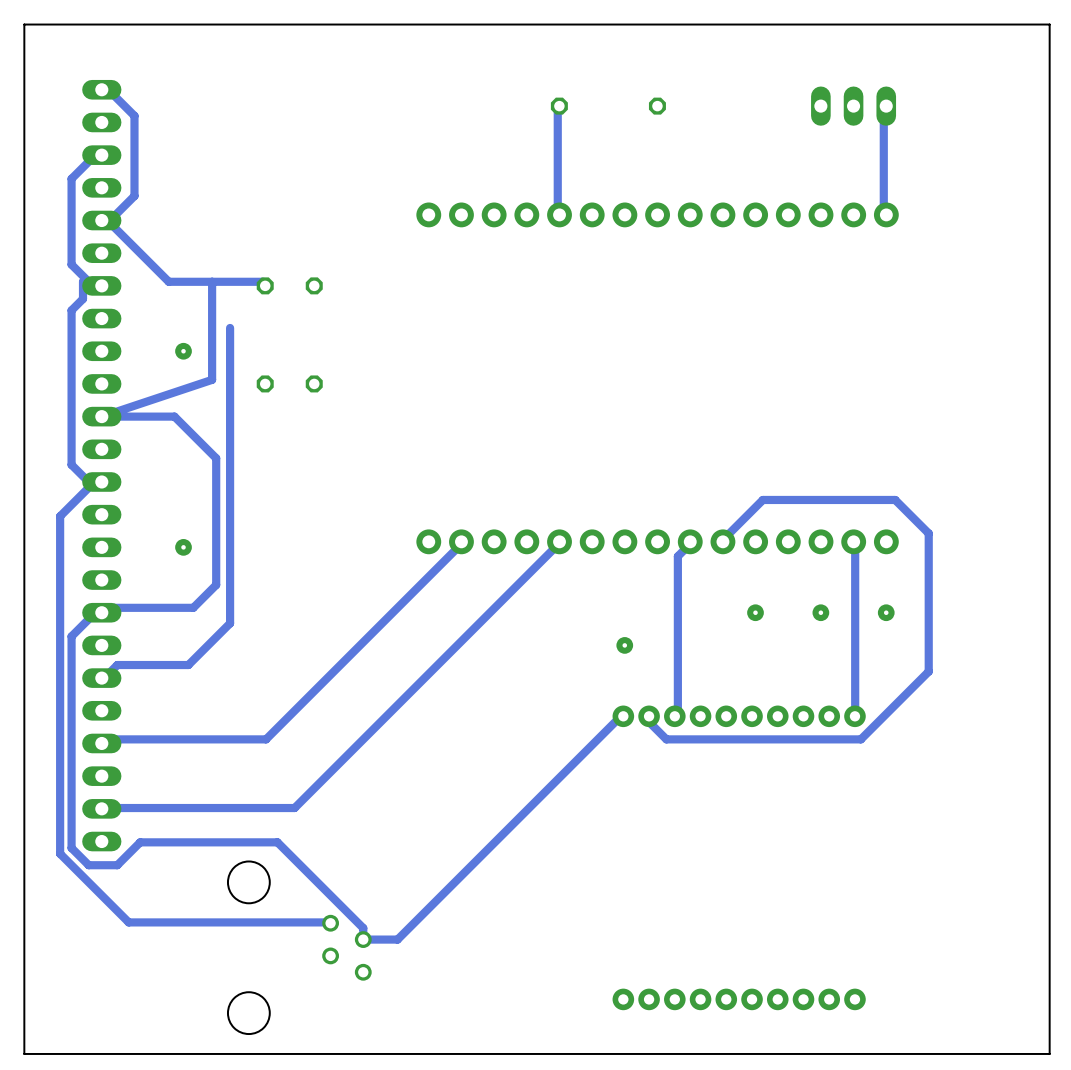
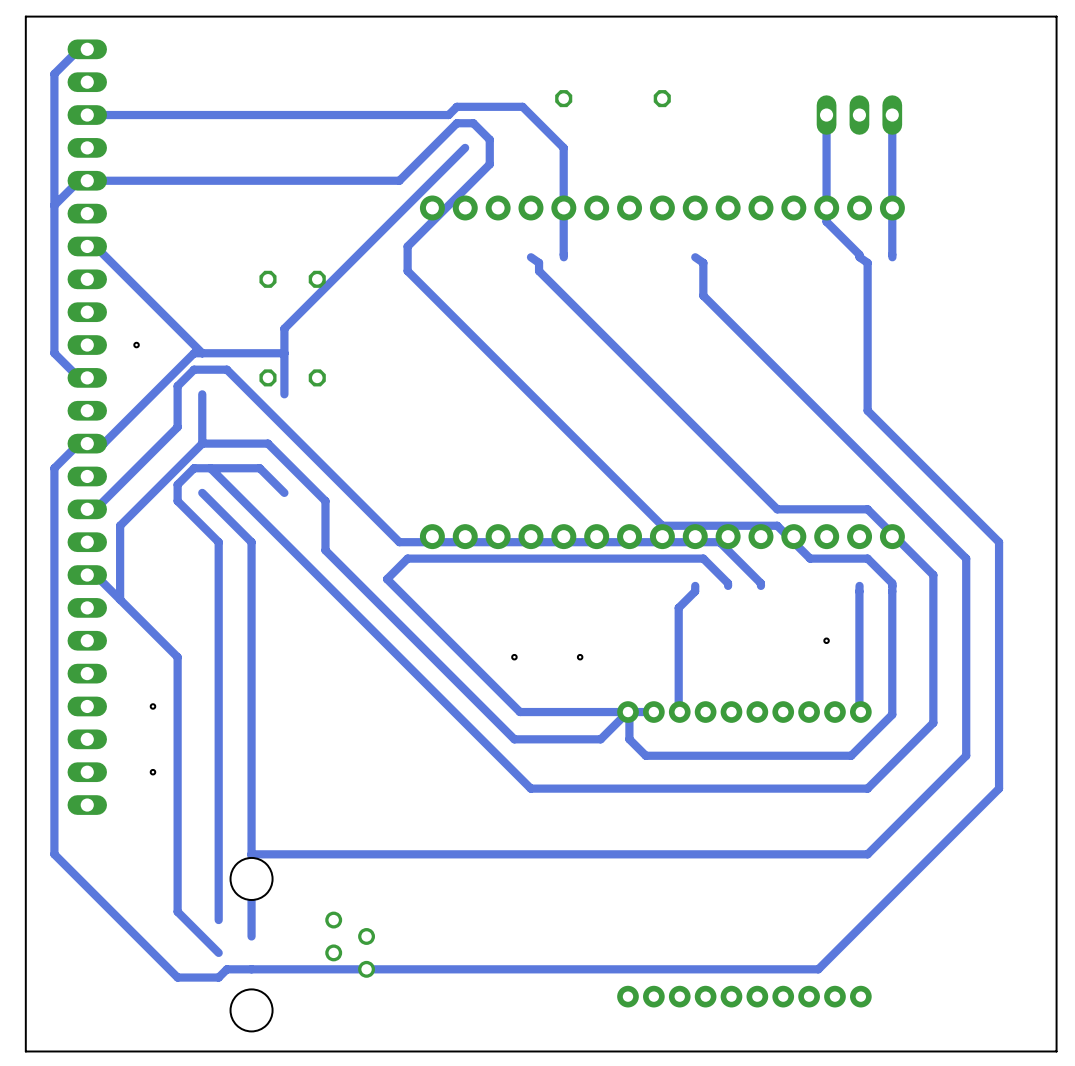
track: none -> (87, 49) (79, 49) (54, 73) (54, 353) (79, 377) (87, 377)
track: (101, 89) (105, 93) (111, 93) (134, 115) (134, 195) (111, 218) (101, 220) (105, 218) (168, 281) (263, 281) -> none
track: (559, 106) (557, 110) (557, 213) (559, 214) -> none
part position: (853, 106) -> (859, 115)
track: (886, 106) (883, 110) (883, 213) (886, 214) -> none
track: none -> (87, 115) (448, 115) (456, 106) (522, 106) (563, 147) (563, 257)
track: none -> (826, 115) (826, 221) (859, 254) (859, 257) (867, 262) (867, 410) (999, 542) (999, 788) (818, 969) (226, 969) (218, 977) (177, 977) (54, 854) (54, 468) (79, 443) (103, 443) (194, 353) (284, 353)
track: none -> (892, 115) (892, 257)
track: (100, 150) (71, 178) (71, 264) (88, 281) (100, 281) (101, 285) (83, 281) (83, 298) (71, 310) (71, 464) (88, 481) (101, 481) -> none
track: none -> (465, 147) (284, 328) (284, 394)
track: none -> (54, 205) (79, 180) (399, 180) (456, 123) (473, 123) (489, 139) (489, 164) (407, 246) (407, 271) (662, 525) (777, 525) (810, 558) (867, 558) (892, 583) (892, 714) (851, 755) (645, 755) (629, 739) (627, 712) (600, 739) (514, 739) (325, 550) (325, 501) (267, 443) (202, 443)
track: none -> (87, 246) (95, 246) (202, 353)
track: none -> (530, 257) (539, 262) (539, 271) (777, 509) (867, 509) (933, 575) (933, 722) (867, 788) (530, 788) (210, 468)
track: none -> (695, 257) (703, 262) (703, 295) (966, 558) (966, 755) (867, 854) (251, 854)
track: (212, 281) (212, 379) (101, 416) (174, 416) (216, 458) (216, 547) -> (284, 492) (259, 468) (194, 468) (177, 484) (177, 501) (218, 542)
track: (230, 327) (230, 623) (188, 665) (117, 665) (101, 678) -> none
hole: none -> (136, 345)
via: (183, 351) -> none
track: none -> (202, 394) (202, 443)
track: none -> (202, 443) (120, 525) (120, 599)
part position: (101, 465) -> (87, 427)
track: (94, 481) (60, 516) (60, 853) (128, 922) (330, 923) -> none
track: none -> (202, 492) (251, 542) (251, 936)
track: none -> (87, 509) (95, 509) (177, 427) (177, 386) (194, 369) (226, 369) (399, 542) (719, 542) (760, 583) (760, 585)
track: (461, 541) (266, 739) (105, 739) (101, 743) -> none
track: (559, 541) (294, 808) (101, 808) -> none
track: (690, 541) (677, 556) (677, 710) (674, 716) -> (695, 585) (695, 591) (678, 607) (679, 712)
track: (722, 541) (762, 499) (895, 499) (928, 533) (928, 671) (860, 739) (666, 739) (649, 722) (649, 716) -> (728, 585) (727, 583) (703, 558) (407, 558) (387, 579) (519, 712) (653, 712)
track: (853, 541) (854, 716) -> (859, 585) (860, 712)
via: (183, 547) -> none
track: none -> (87, 575) (95, 575) (177, 657) (177, 911) (218, 952)
track: (216, 584) (193, 607) (105, 607) (101, 612) (100, 607) (71, 636) (71, 848) (88, 865) (117, 865) (140, 842) (277, 842) (363, 928) (363, 939) (397, 939) (620, 716) (623, 716) -> (218, 579) (218, 920)
via: (755, 612) -> none
via: (820, 612) -> none
via: (886, 612) -> none
via: (624, 645) -> none
hole: none -> (826, 640)
hole: none -> (514, 657)
hole: none -> (580, 657)
hole: none -> (152, 706)
hole: none -> (152, 772)

